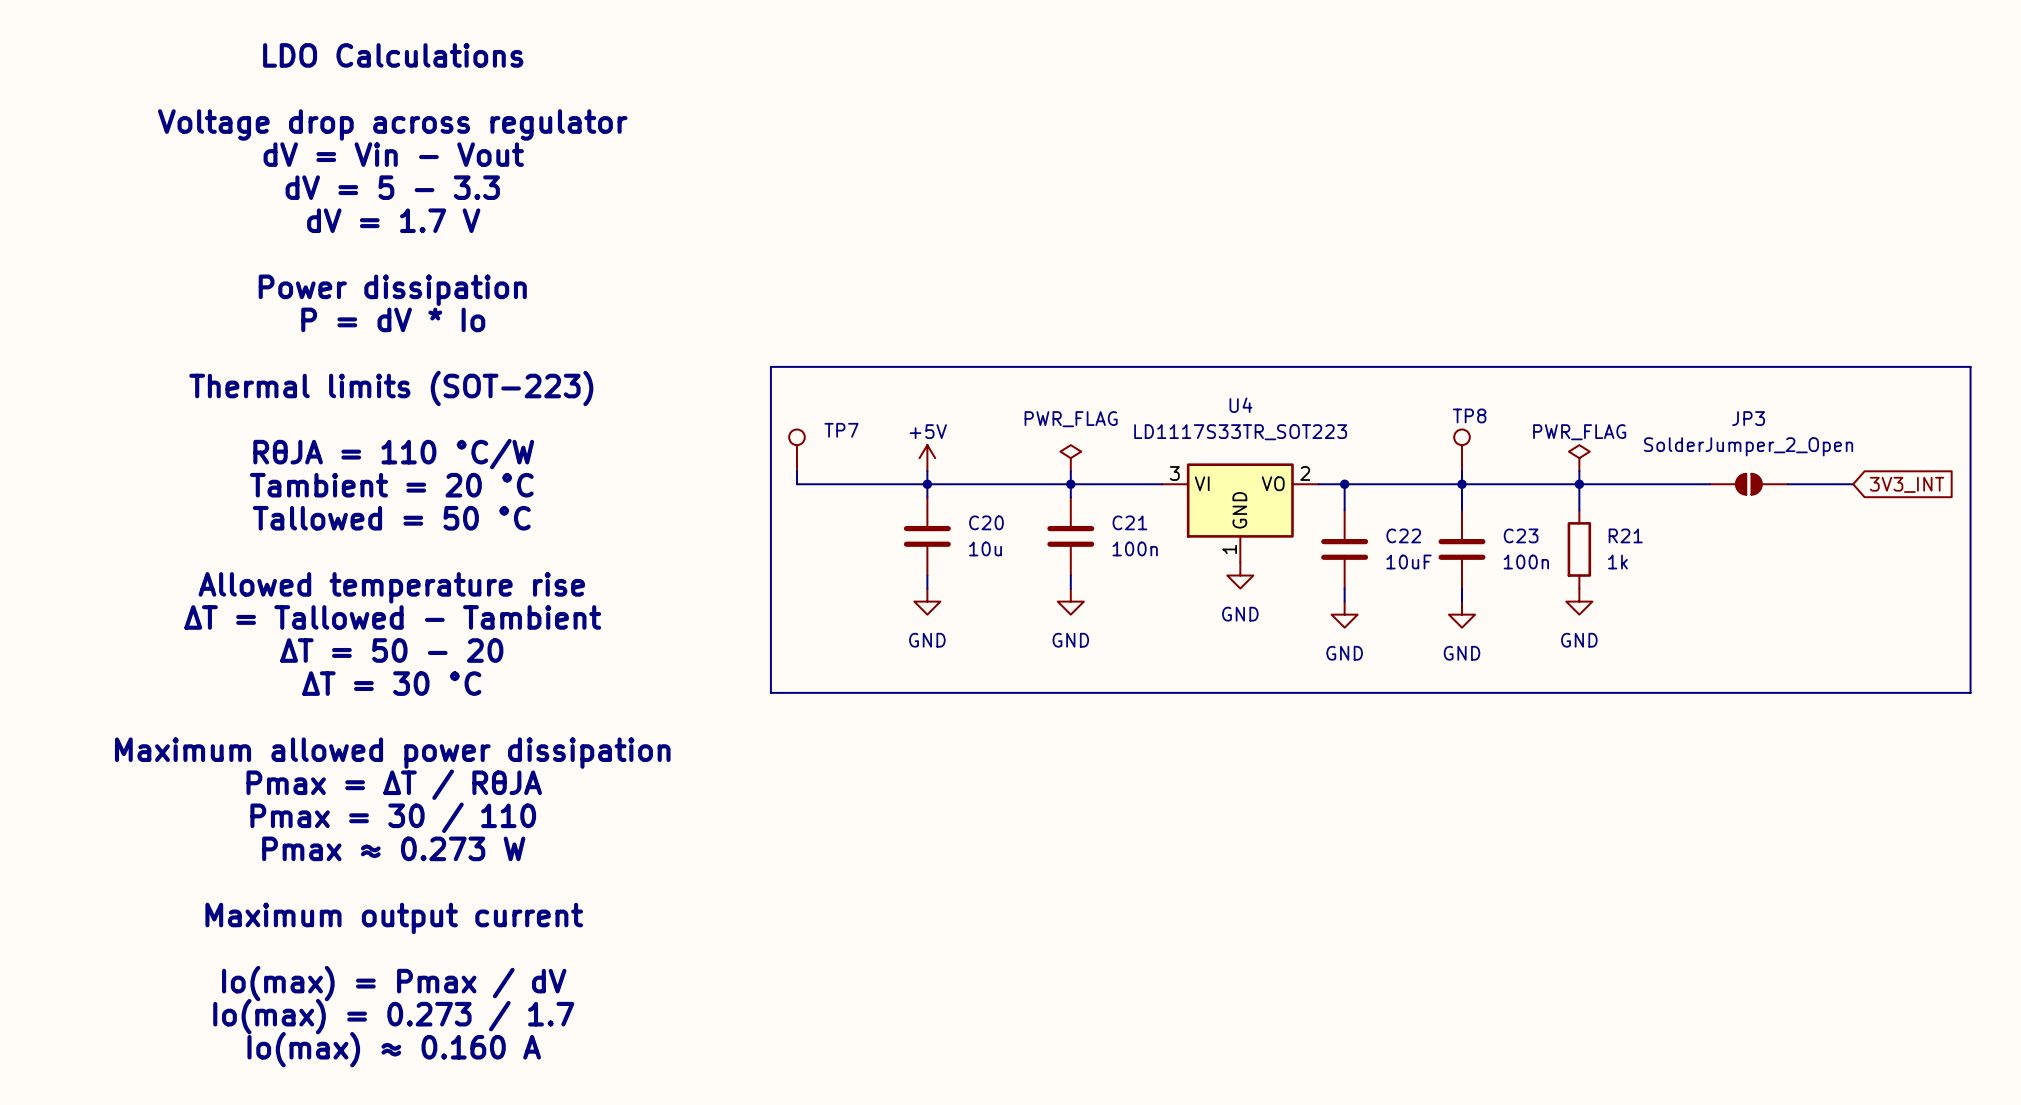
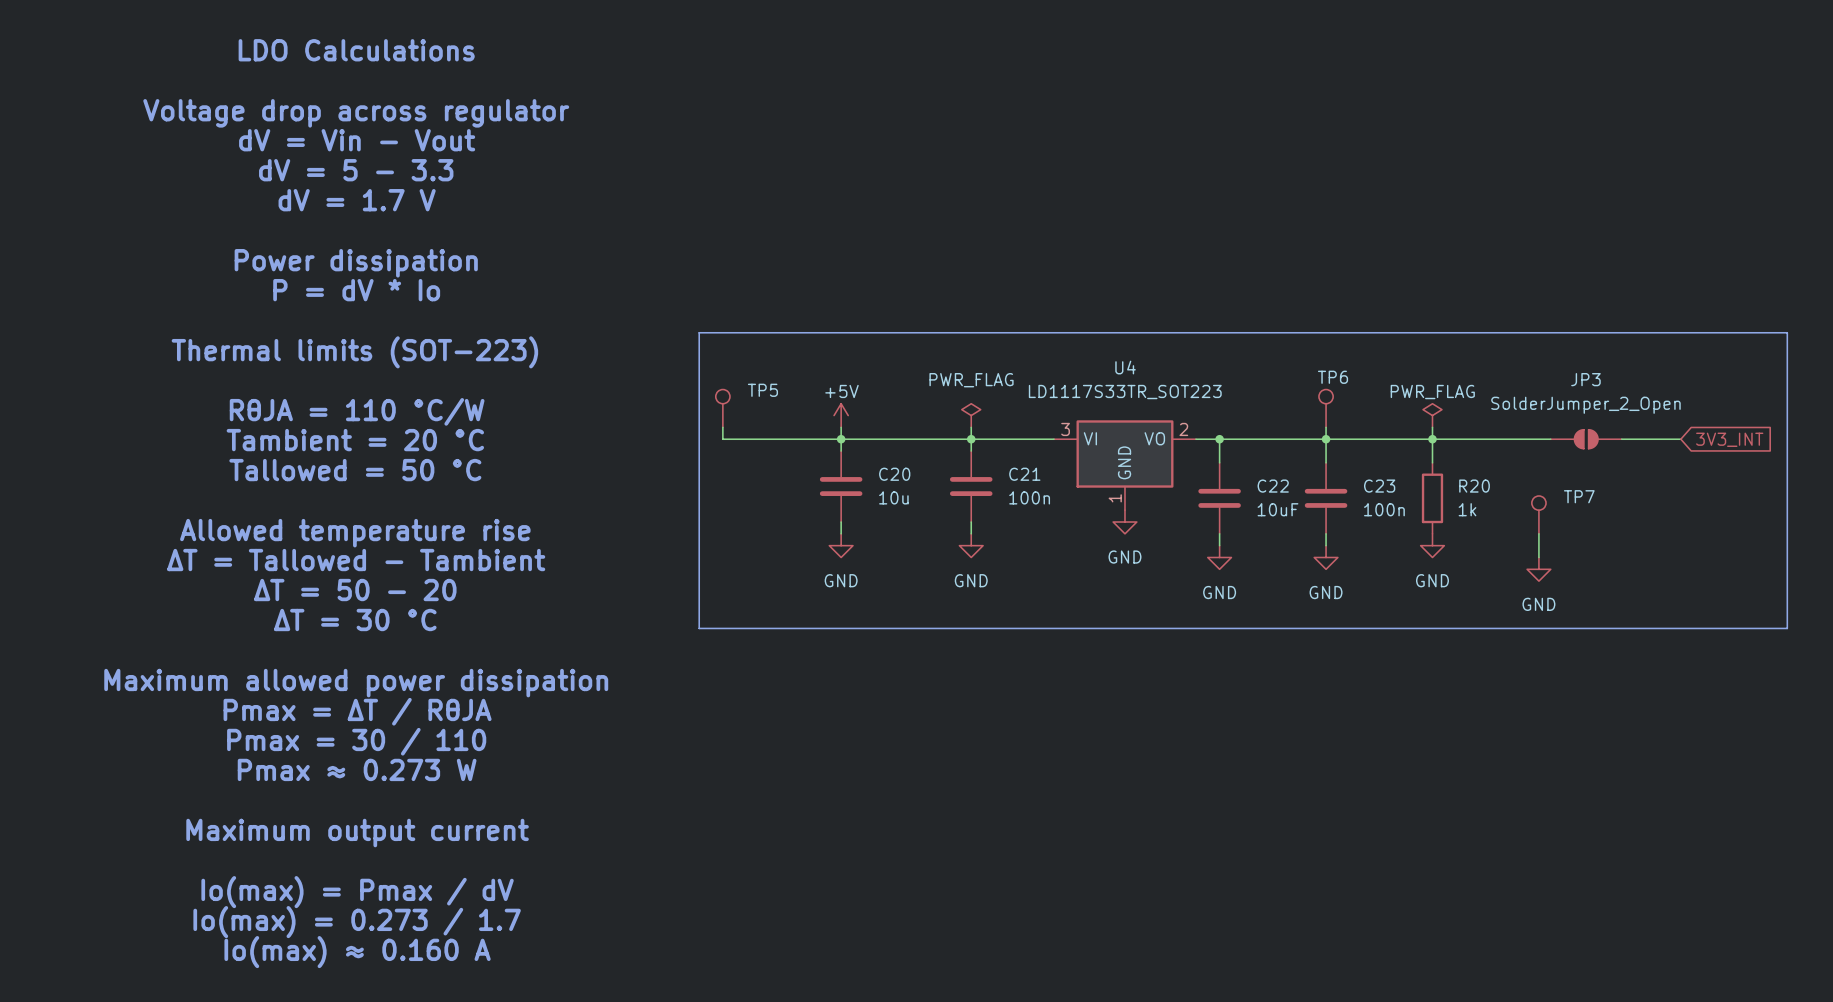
TP8 name: TP8 (1469, 415) -> TP6 (1333, 377)
TP7 name: TP7 (841, 430) -> TP5 (762, 390)
R21 name: R21 (1625, 535) -> R20 (1474, 486)
TP7: none -> (1538, 514)
wire: none -> (1538, 533) (1538, 557)
power symbol: none -> GND (1538, 569)

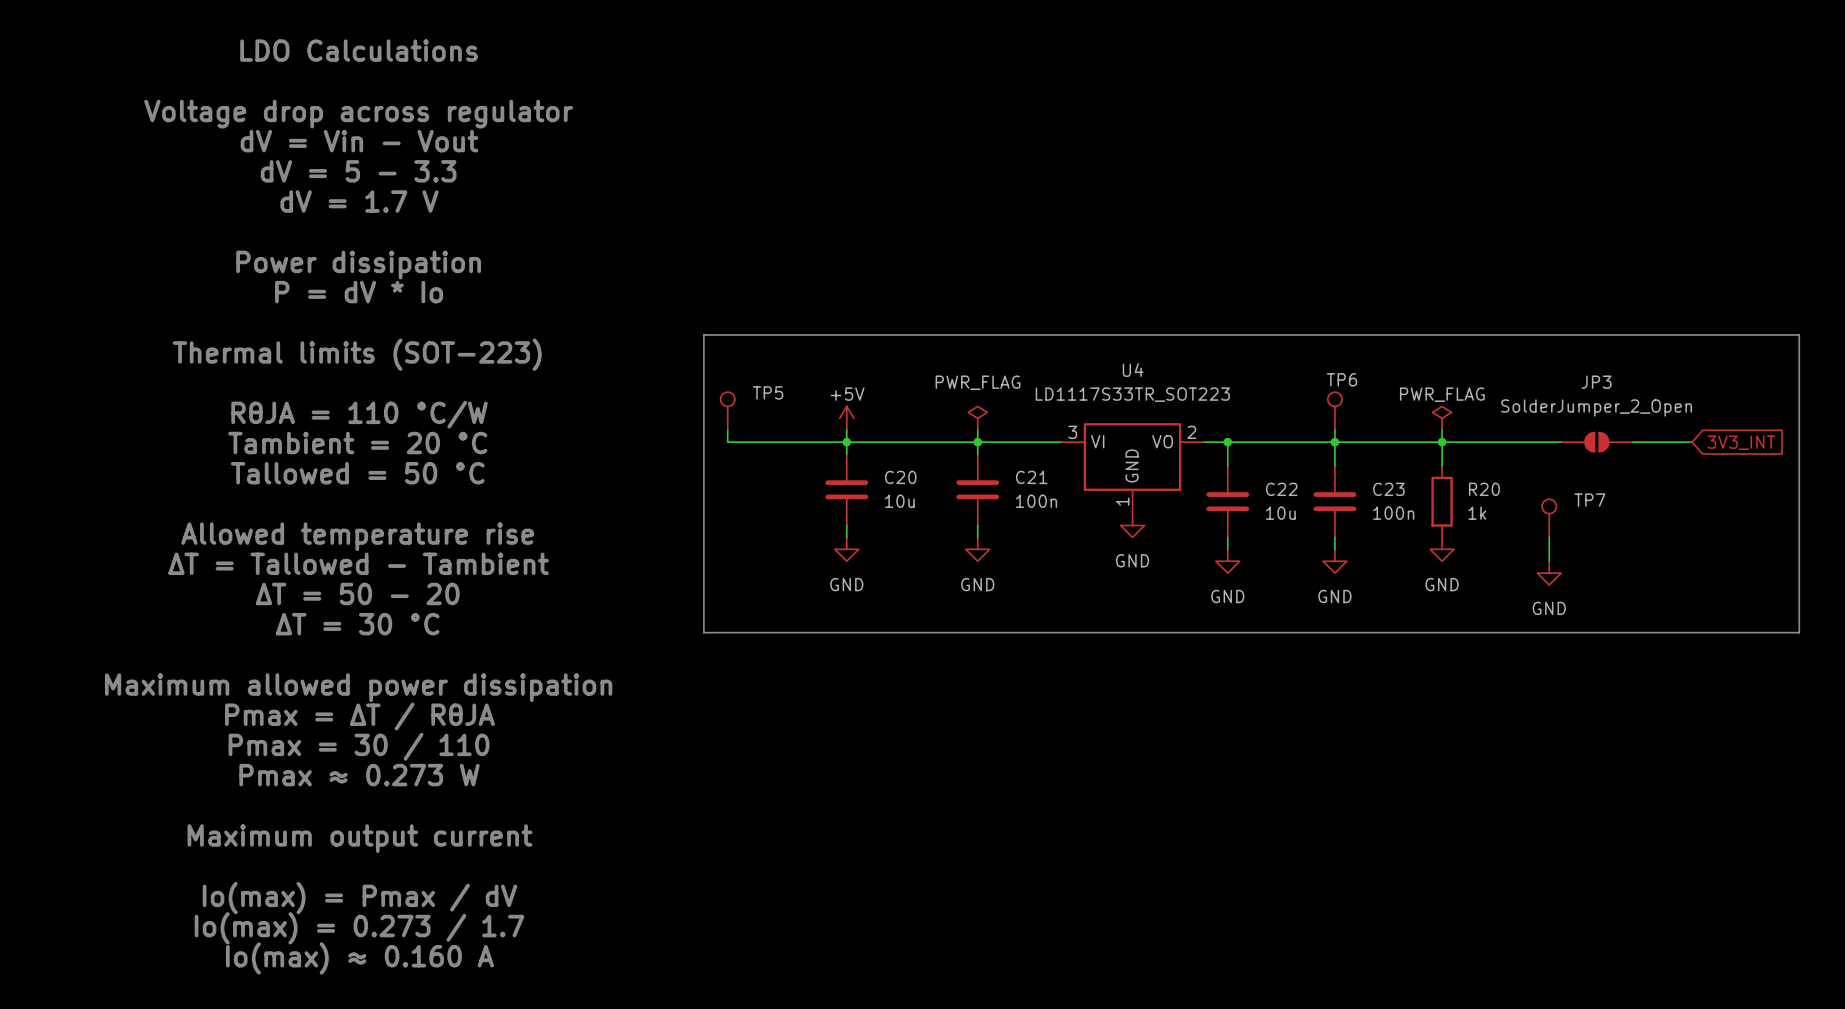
C22 value: 10uF (1277, 509) -> 10u (1280, 513)

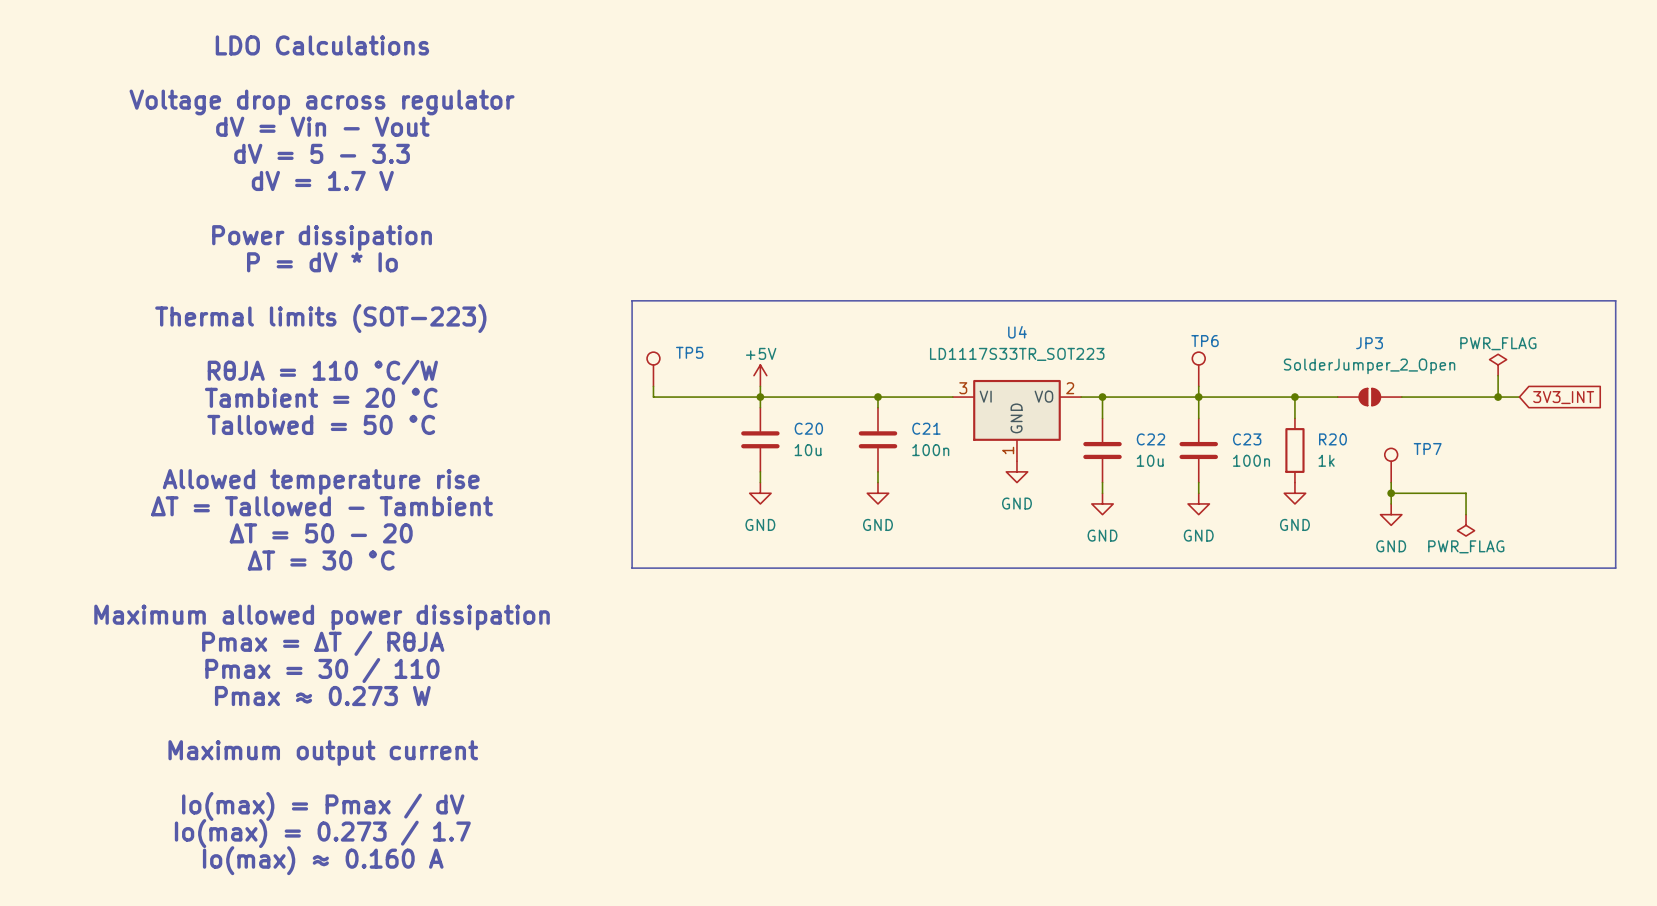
power symbol: none -> PWR_FLAG (1498, 364)
power symbol: PWR_FLAG (977, 418) -> none
power symbol: PWR_FLAG (1442, 418) -> none
wire: none -> (1498, 375) (1498, 397)
wire: (977, 430) (977, 442) -> none
wire: (1442, 430) (1442, 442) -> none
JP3 position: (1596, 442) -> (1369, 397)
junction: none -> (1498, 397)
wire: none -> (1391, 493) (1466, 493) (1466, 514)
junction: none -> (1391, 493)
power symbol: none -> PWR_FLAG (1466, 525)

